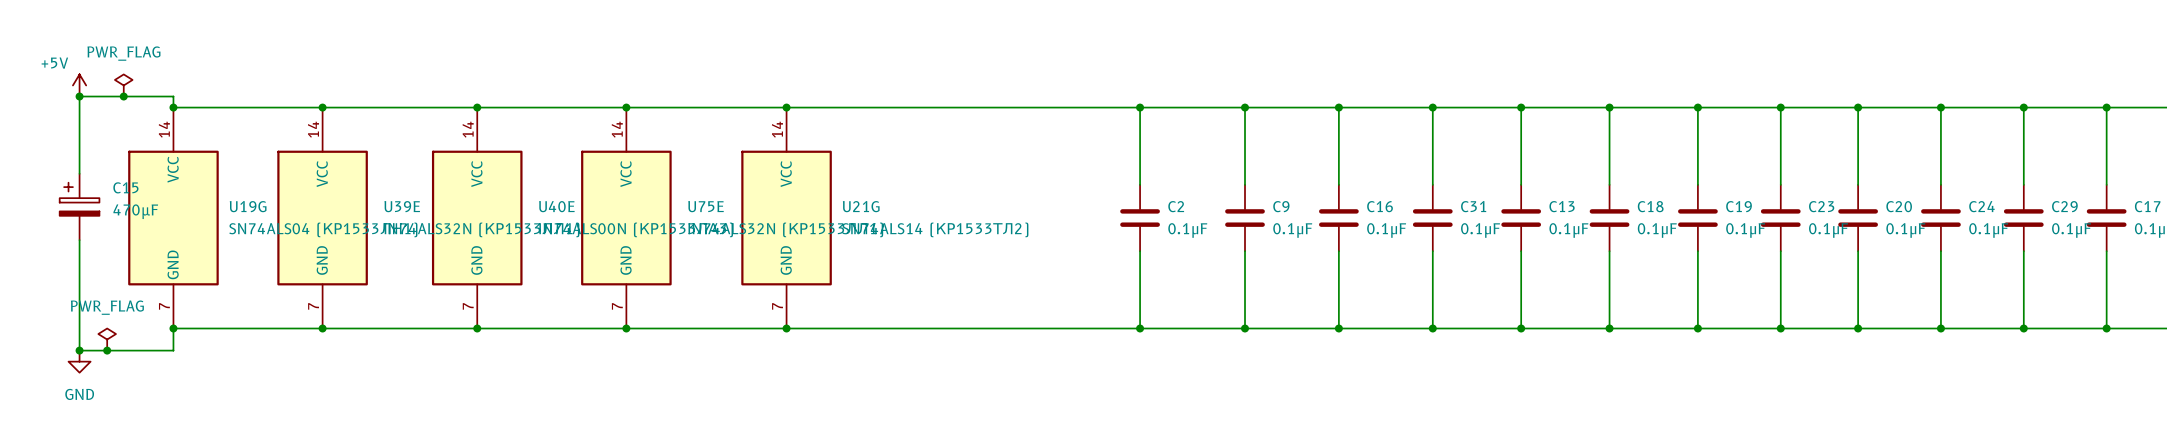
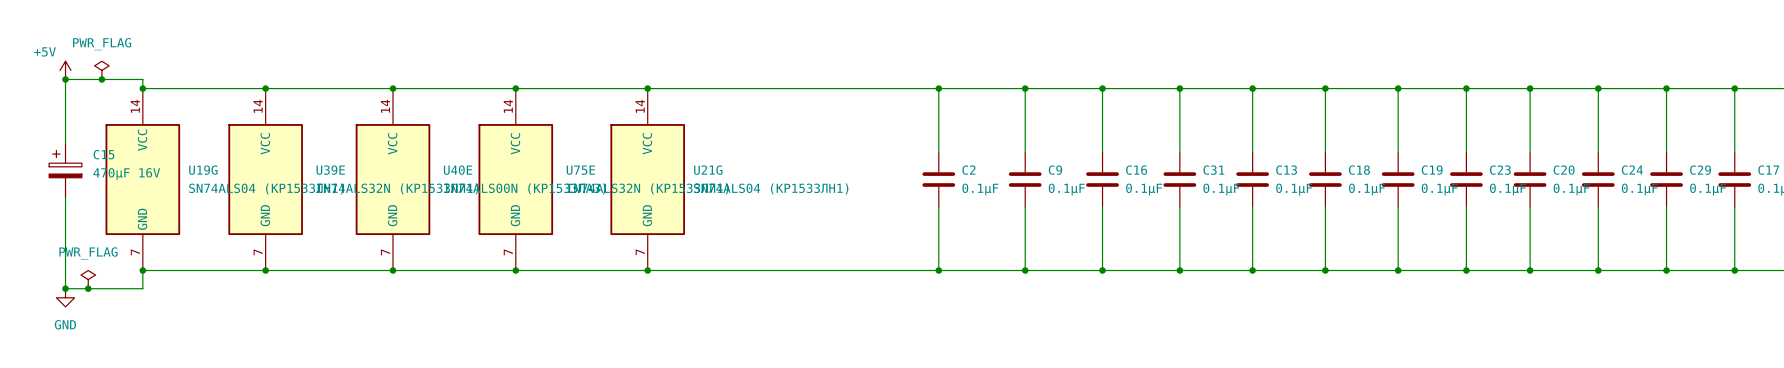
C15 value: 470µF (135, 211) -> 470µF 16V (126, 174)
U21G value: SN74ALS14 (КР1533ТЛ2) (935, 229) -> SN74ALS04 (КР1533ЛН1) (771, 188)

